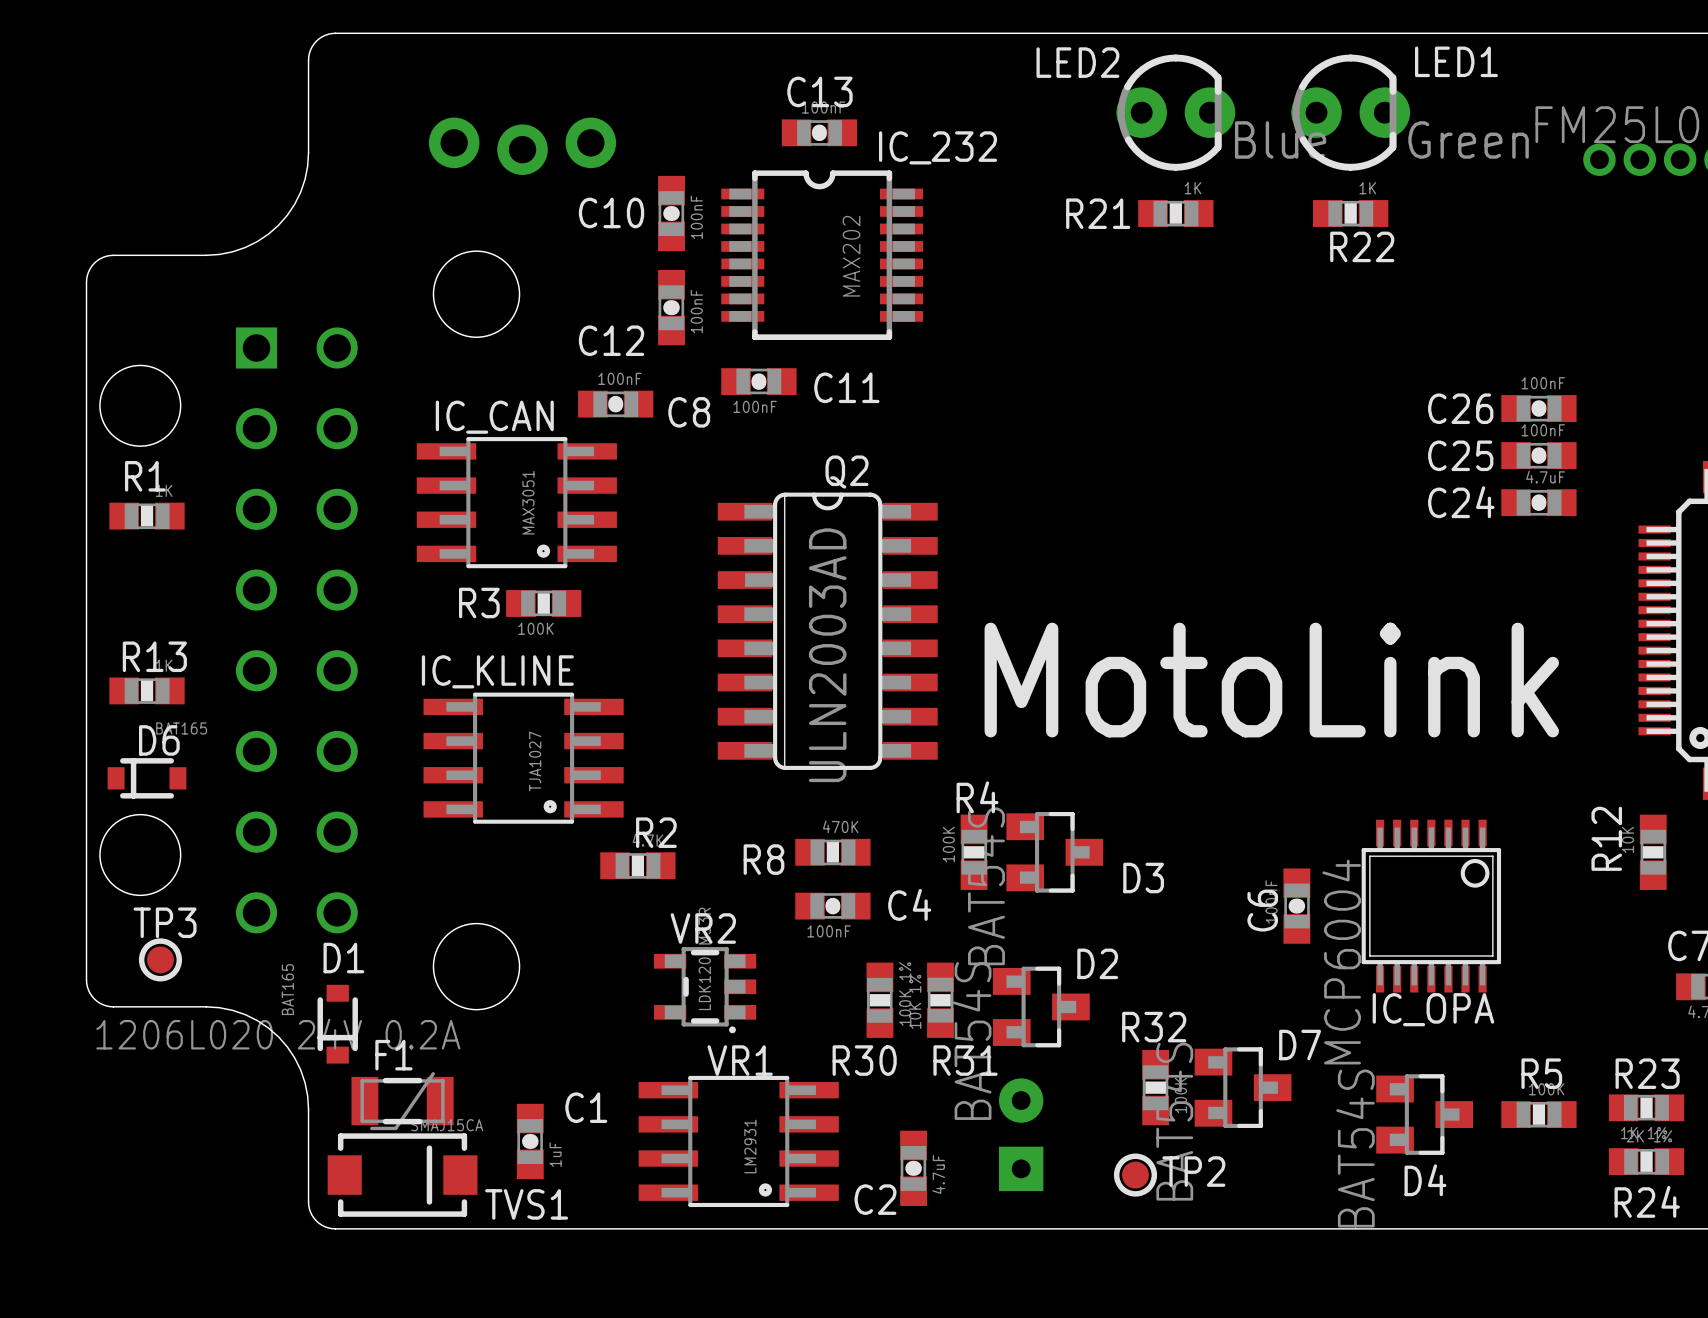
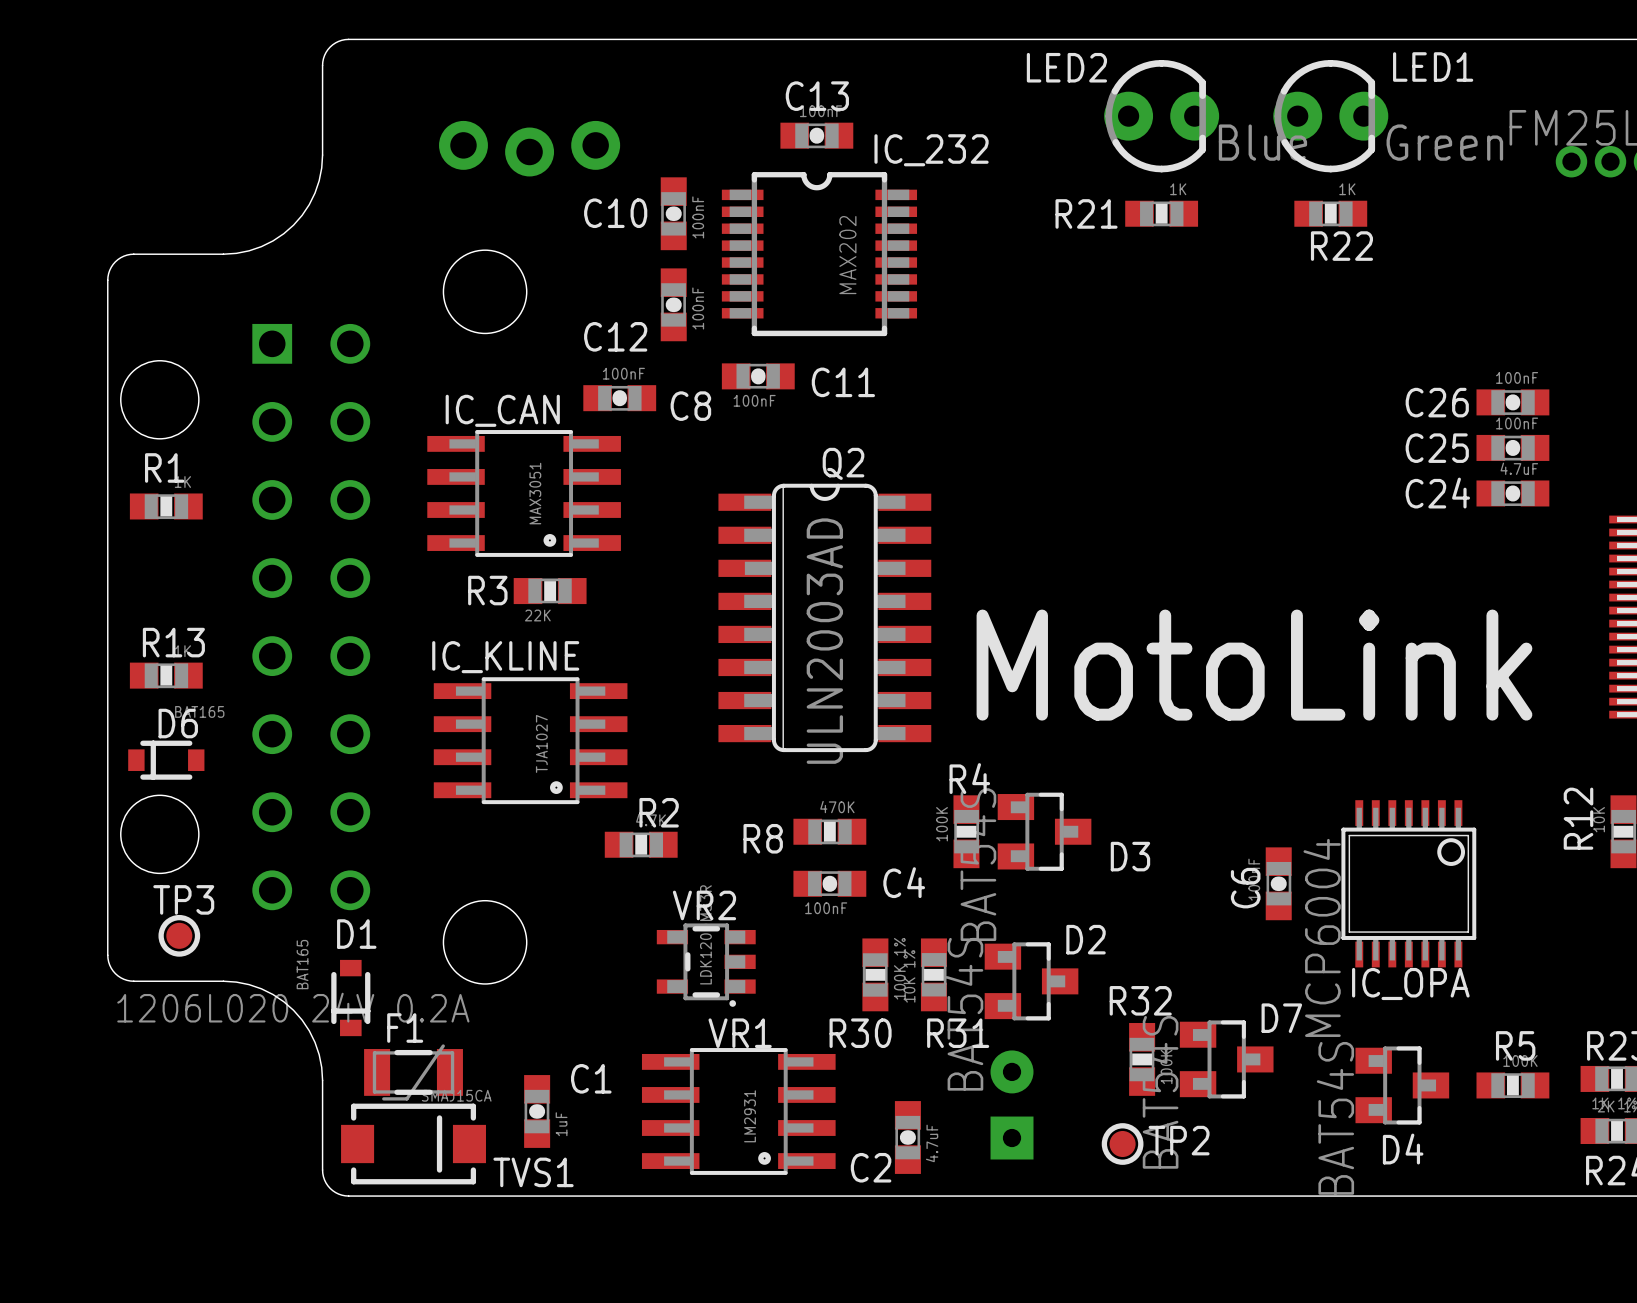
R3 value: 100K (535, 628) -> 22K (537, 615)

